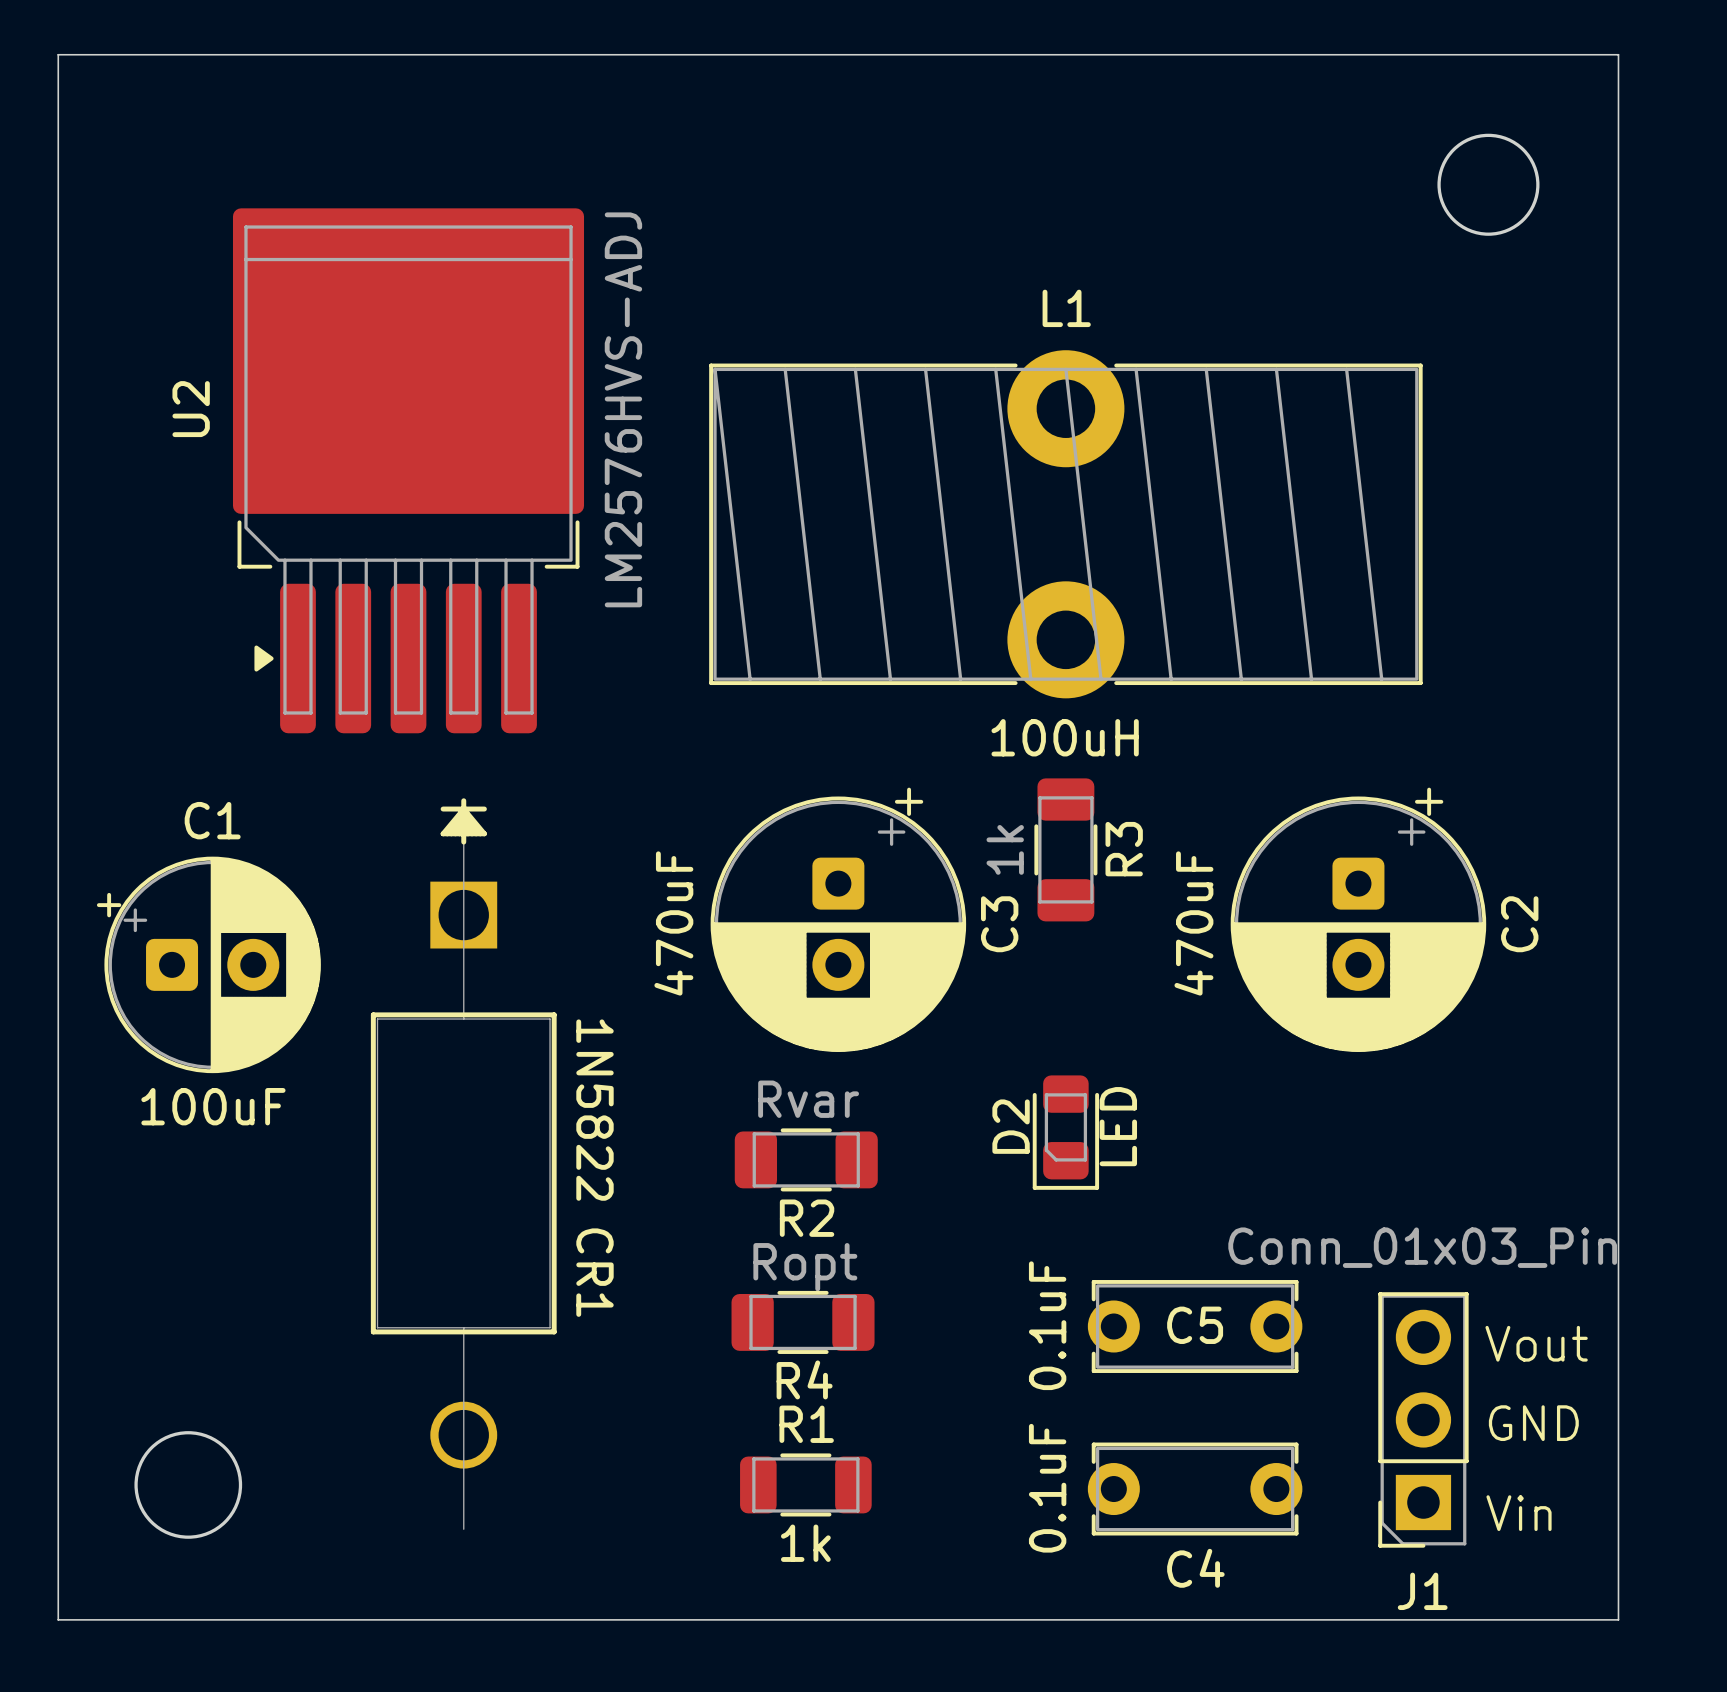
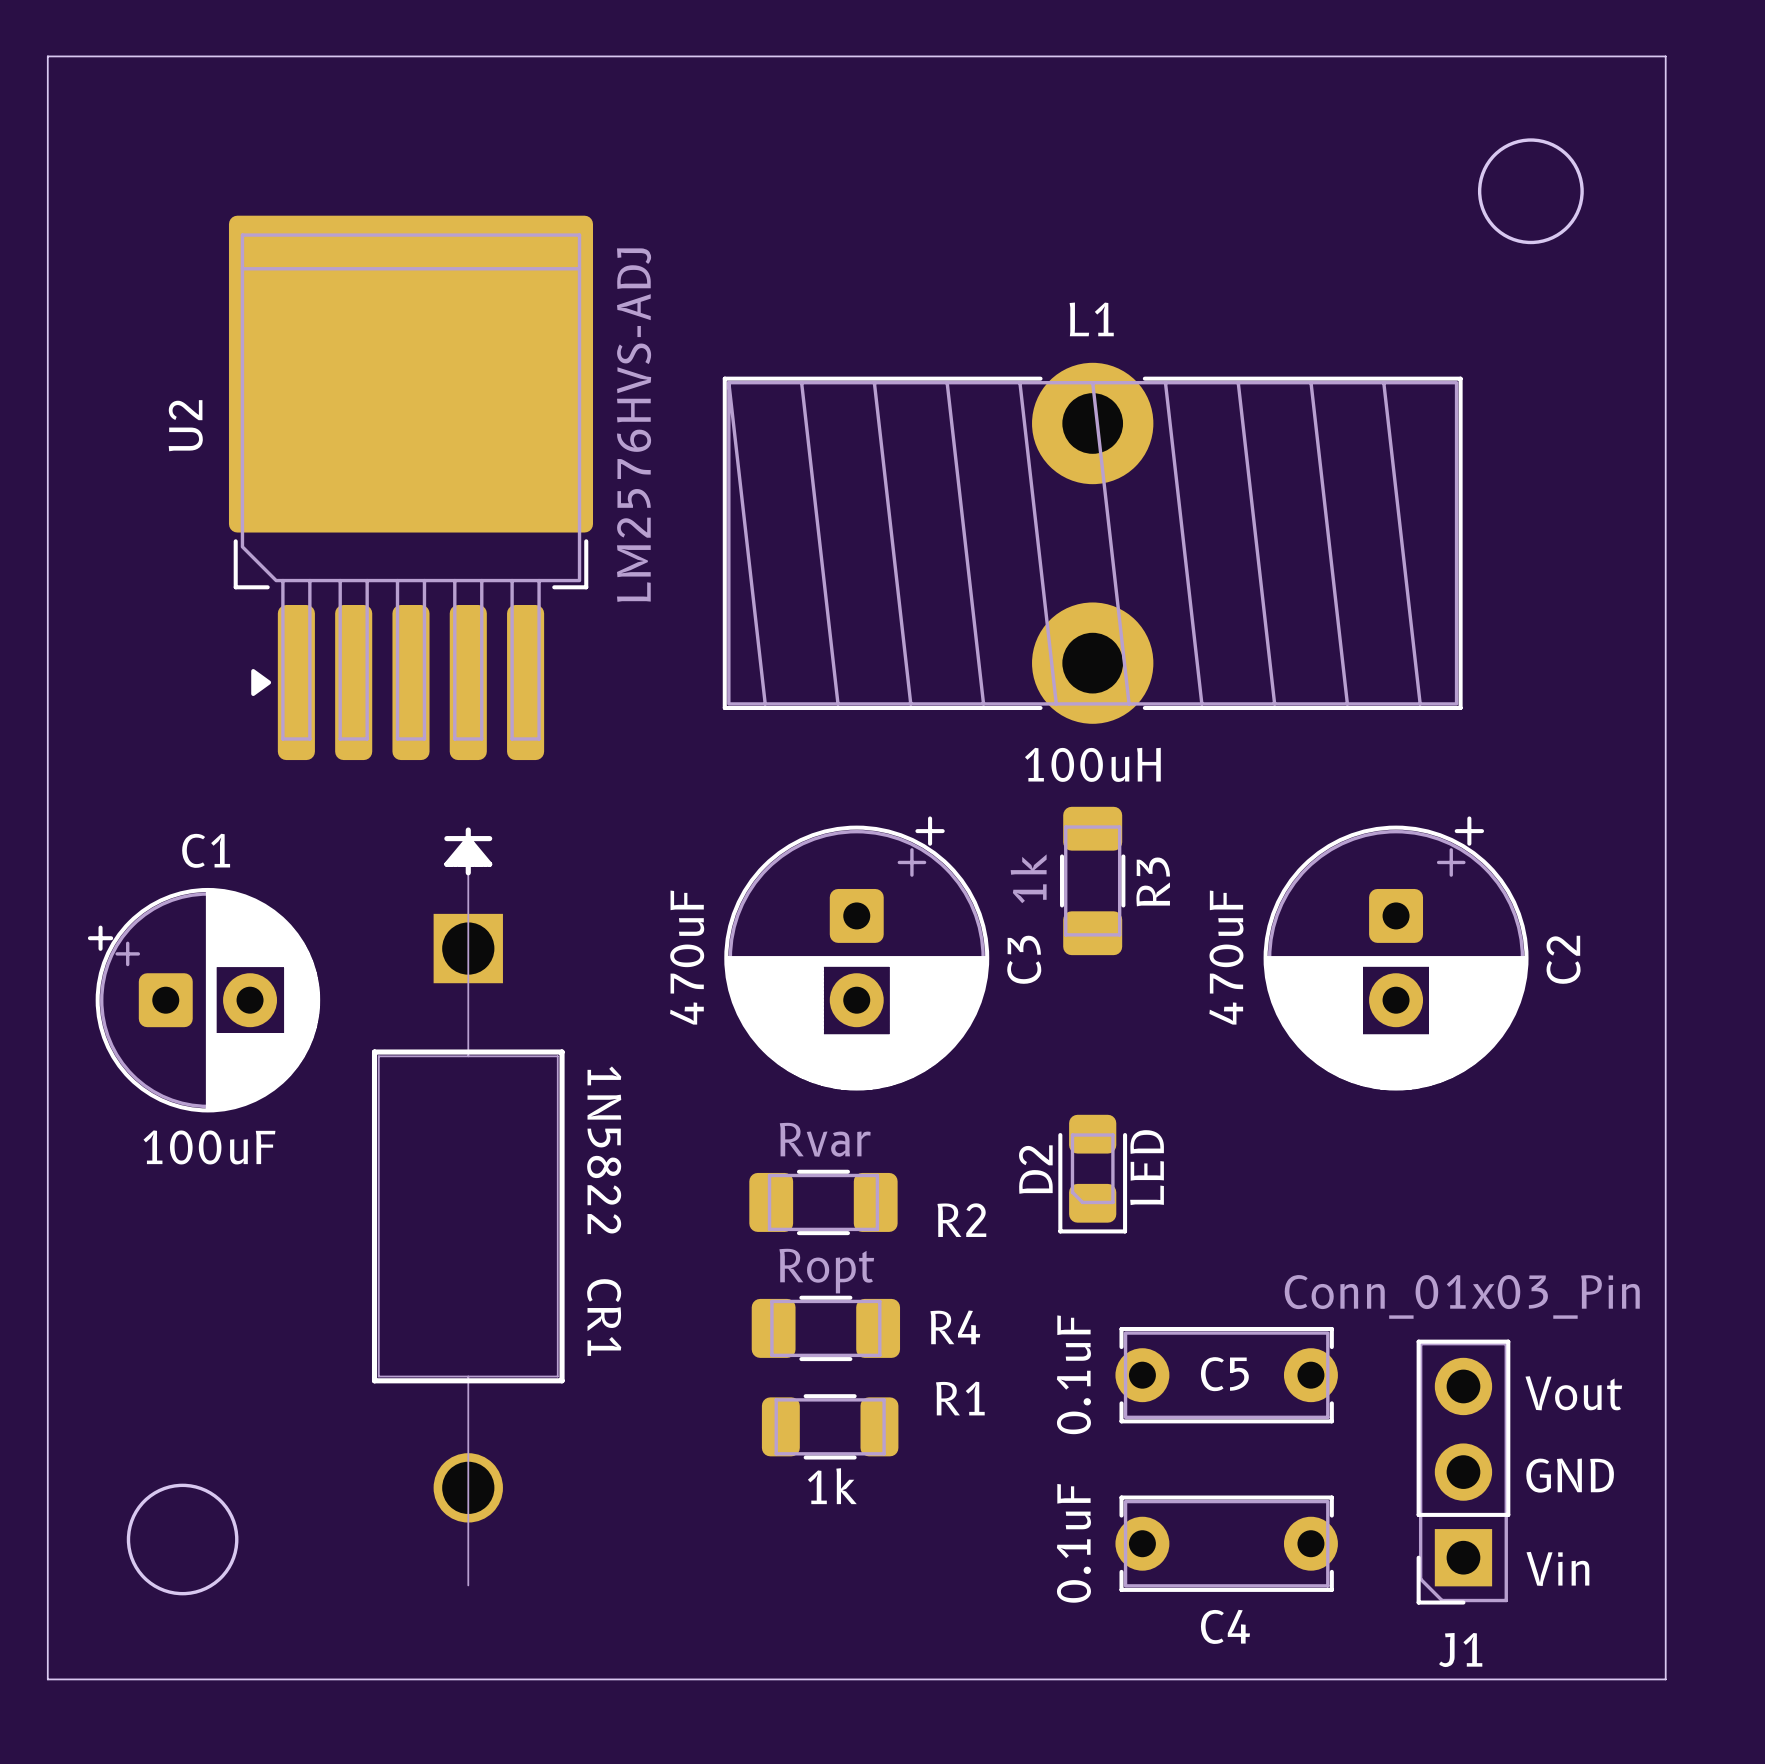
R2 name position: R2 (807, 1218) -> R2 (961, 1220)
R4 position: (803, 1322) -> (825, 1328)
R4 name position: R4 (804, 1379) -> R4 (955, 1327)
R1 name position: R1 (806, 1424) -> R1 (960, 1398)
R1 position: (805, 1484) -> (830, 1426)

